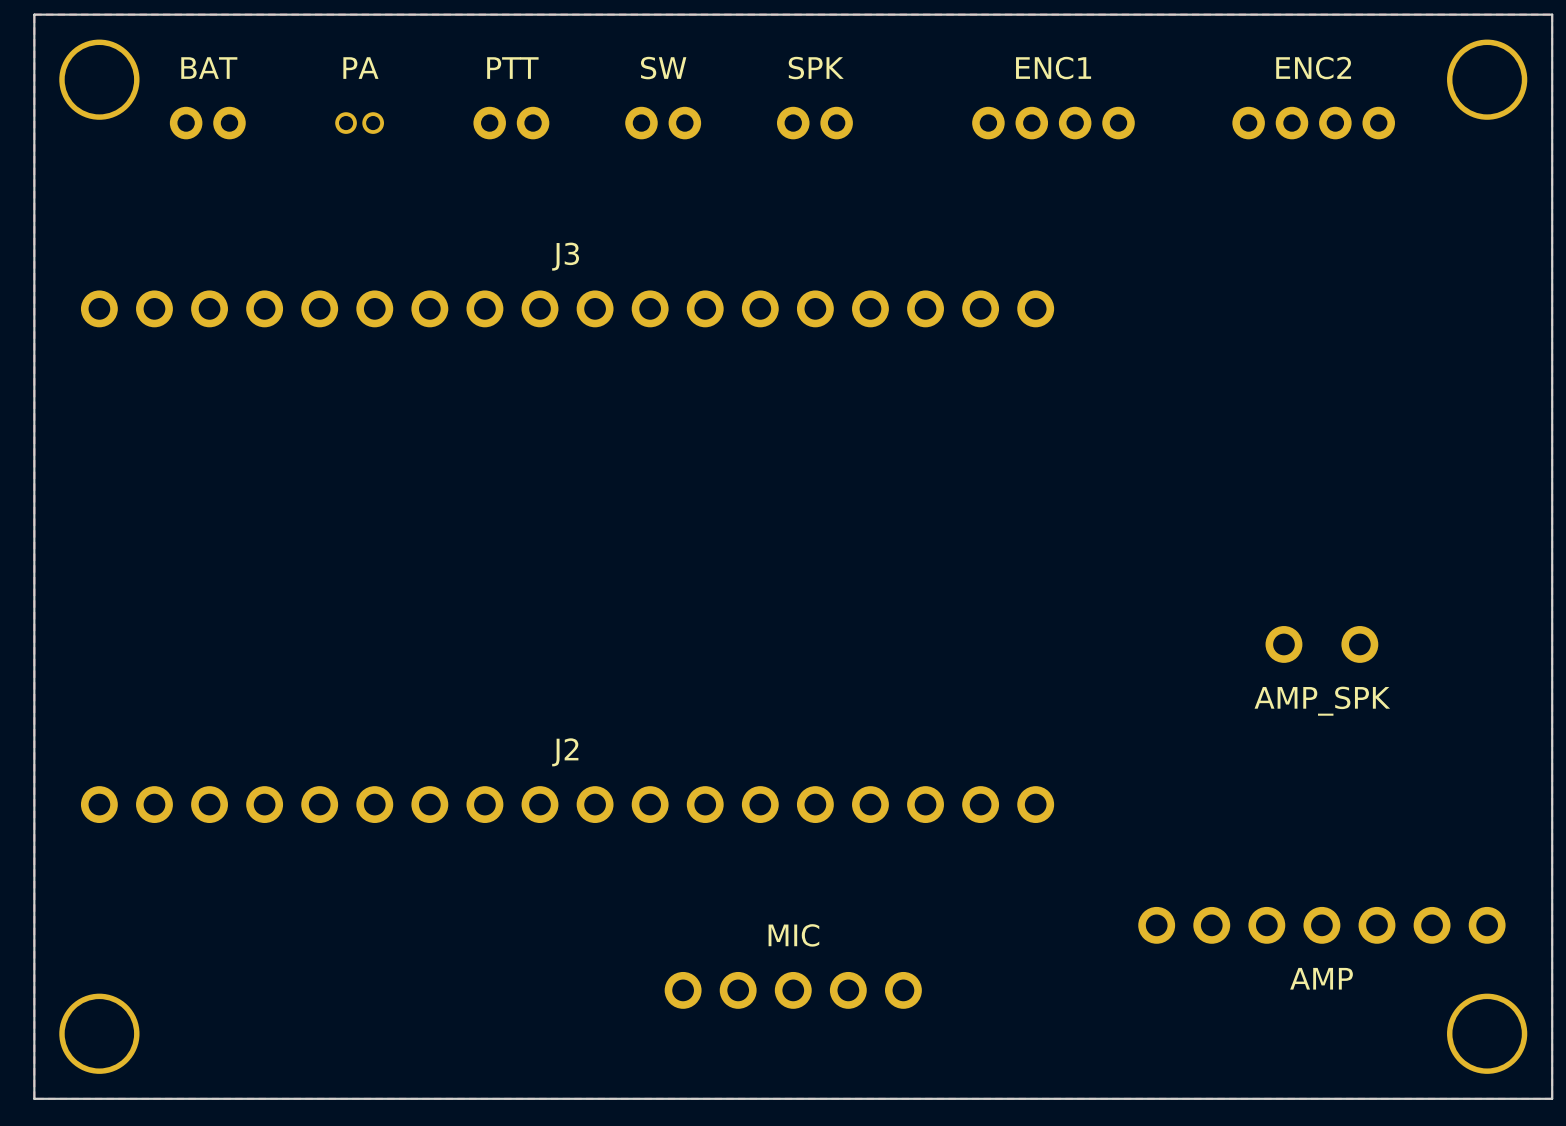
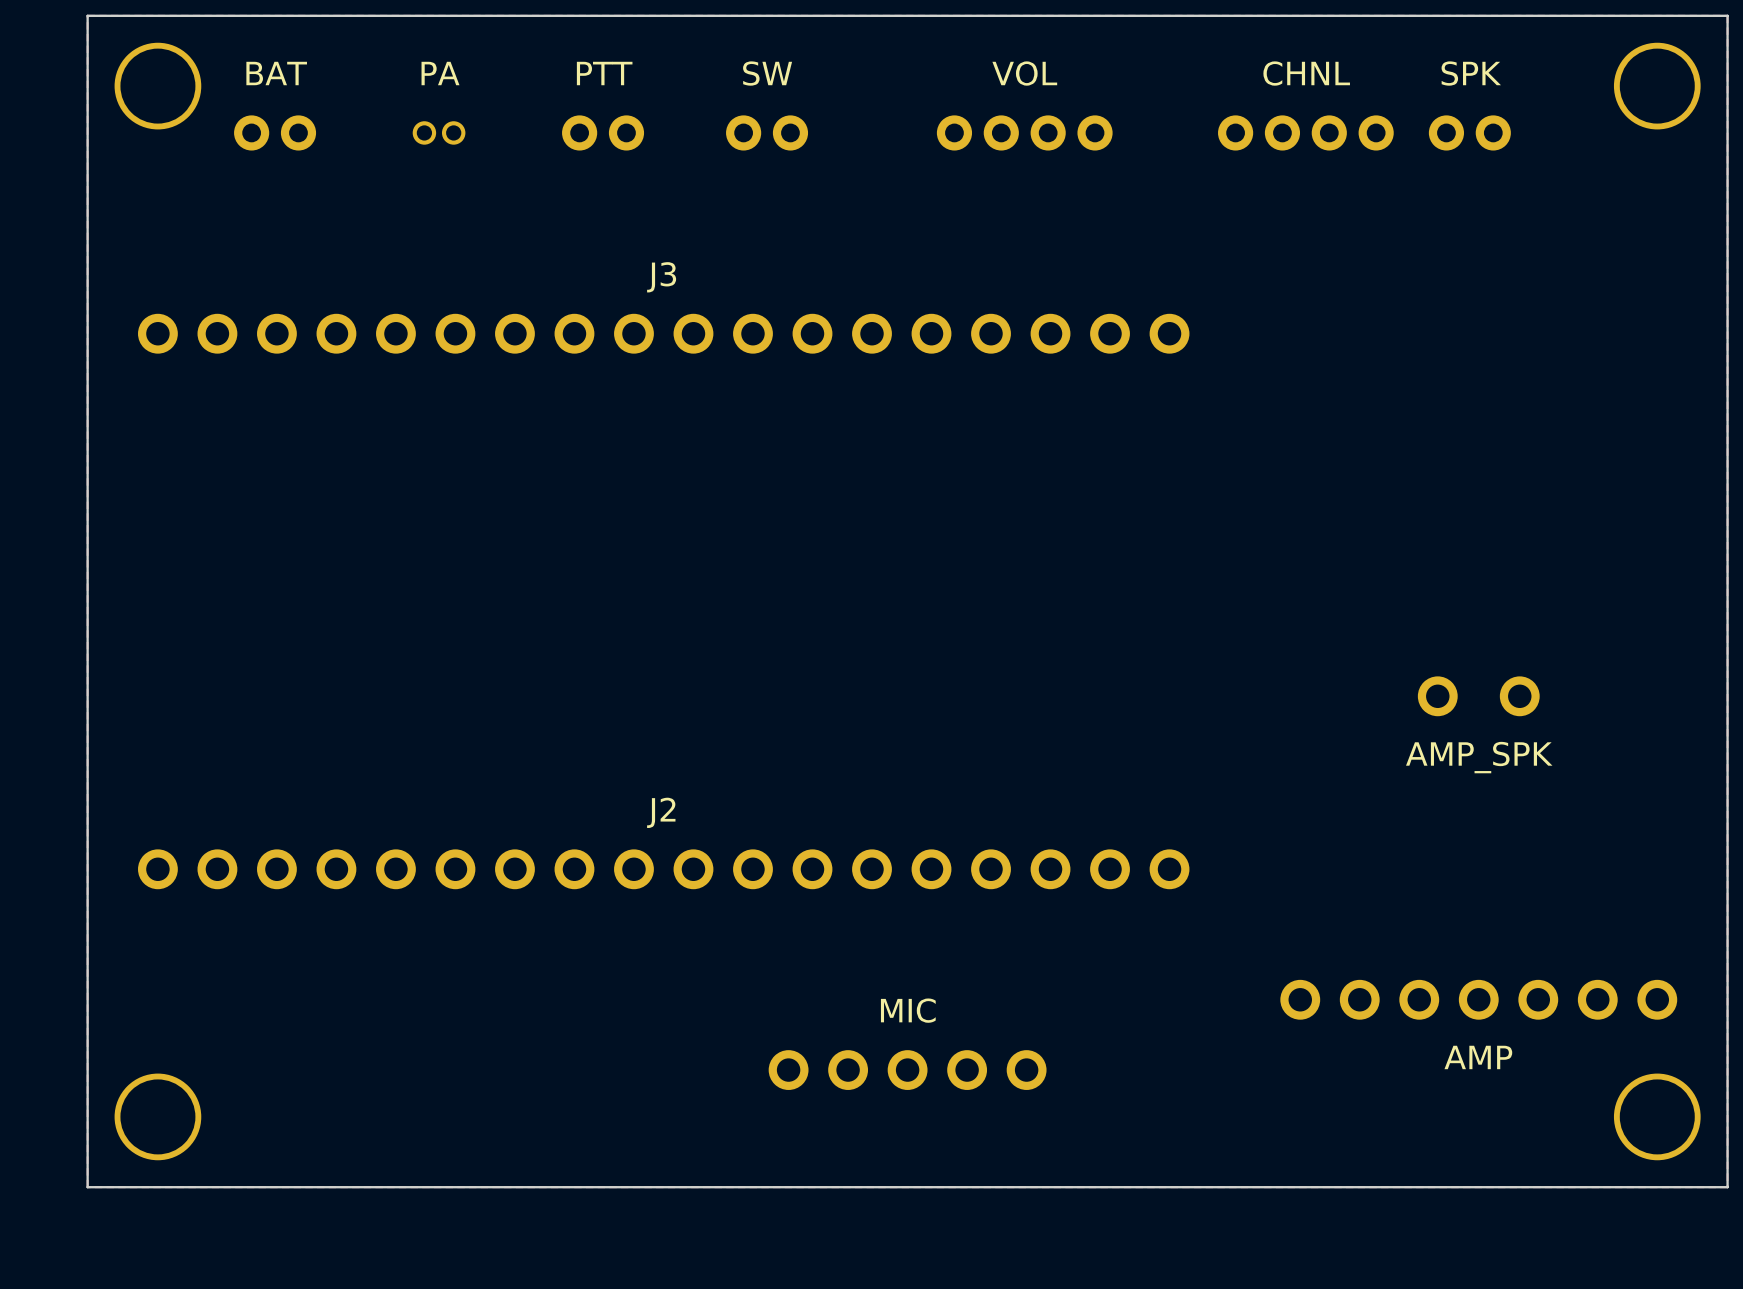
SPK position: (814, 123) -> (1469, 132)
VOL: none -> (1024, 132)
ENC1: (1053, 123) -> none
CHNL: none -> (1305, 132)
ENC2: (1313, 123) -> none

